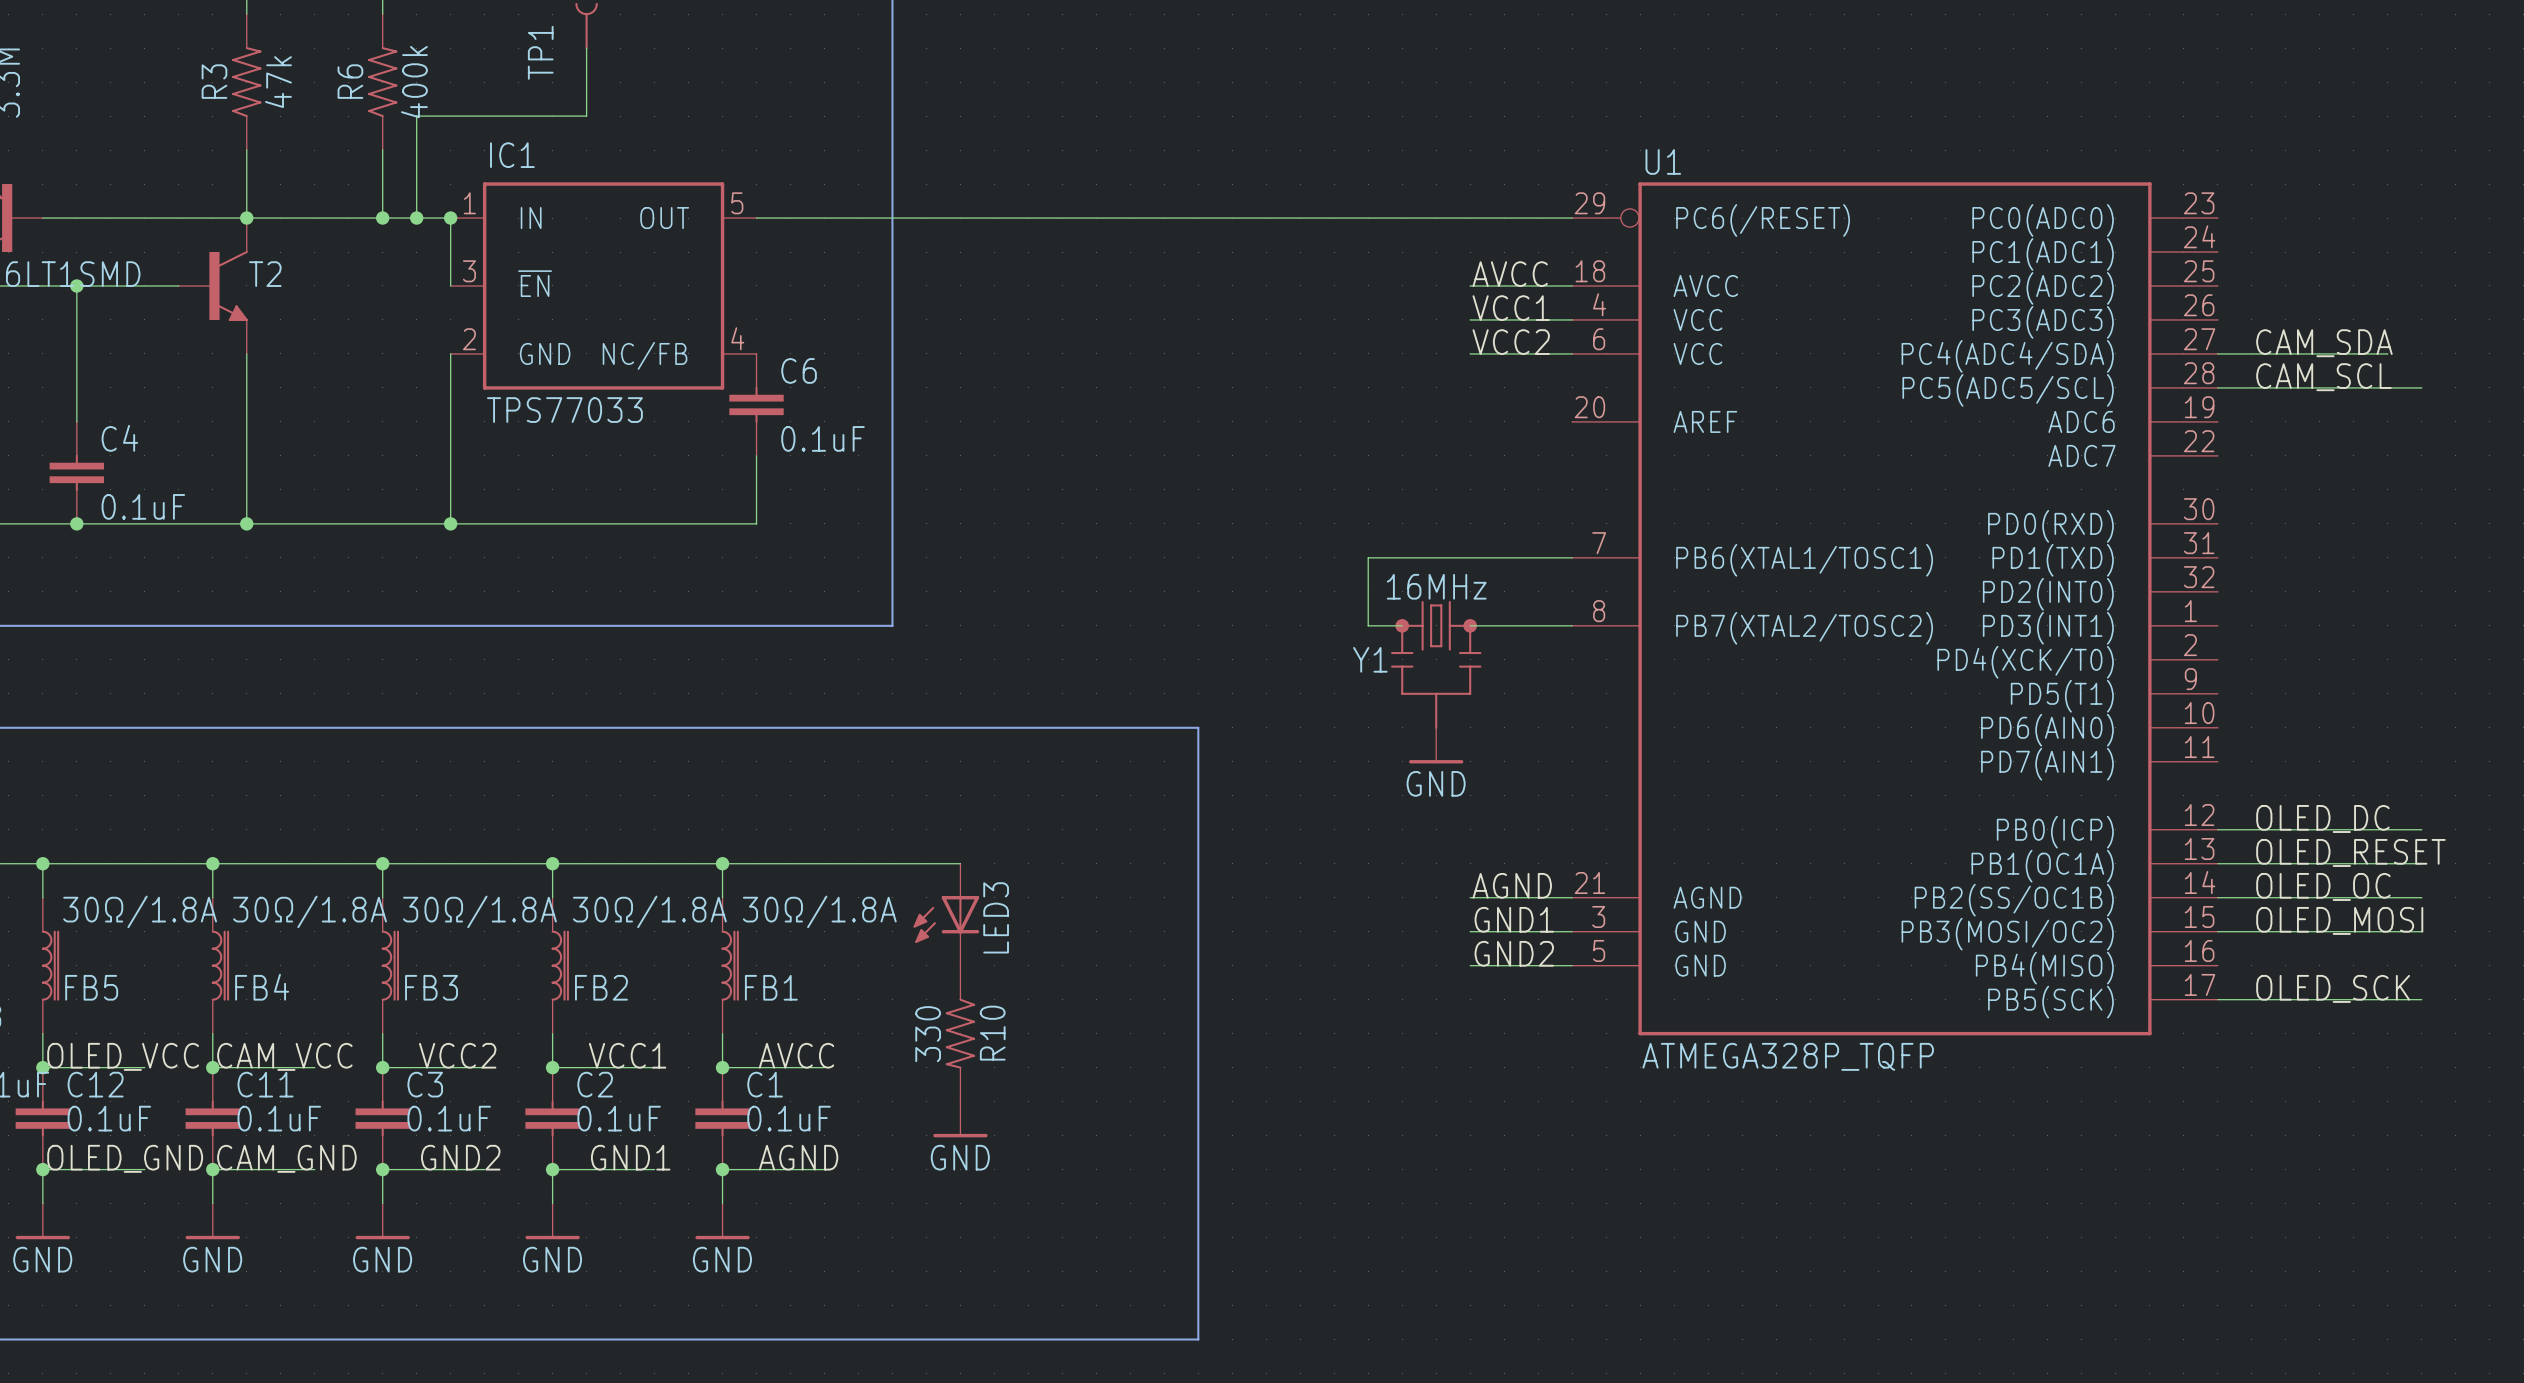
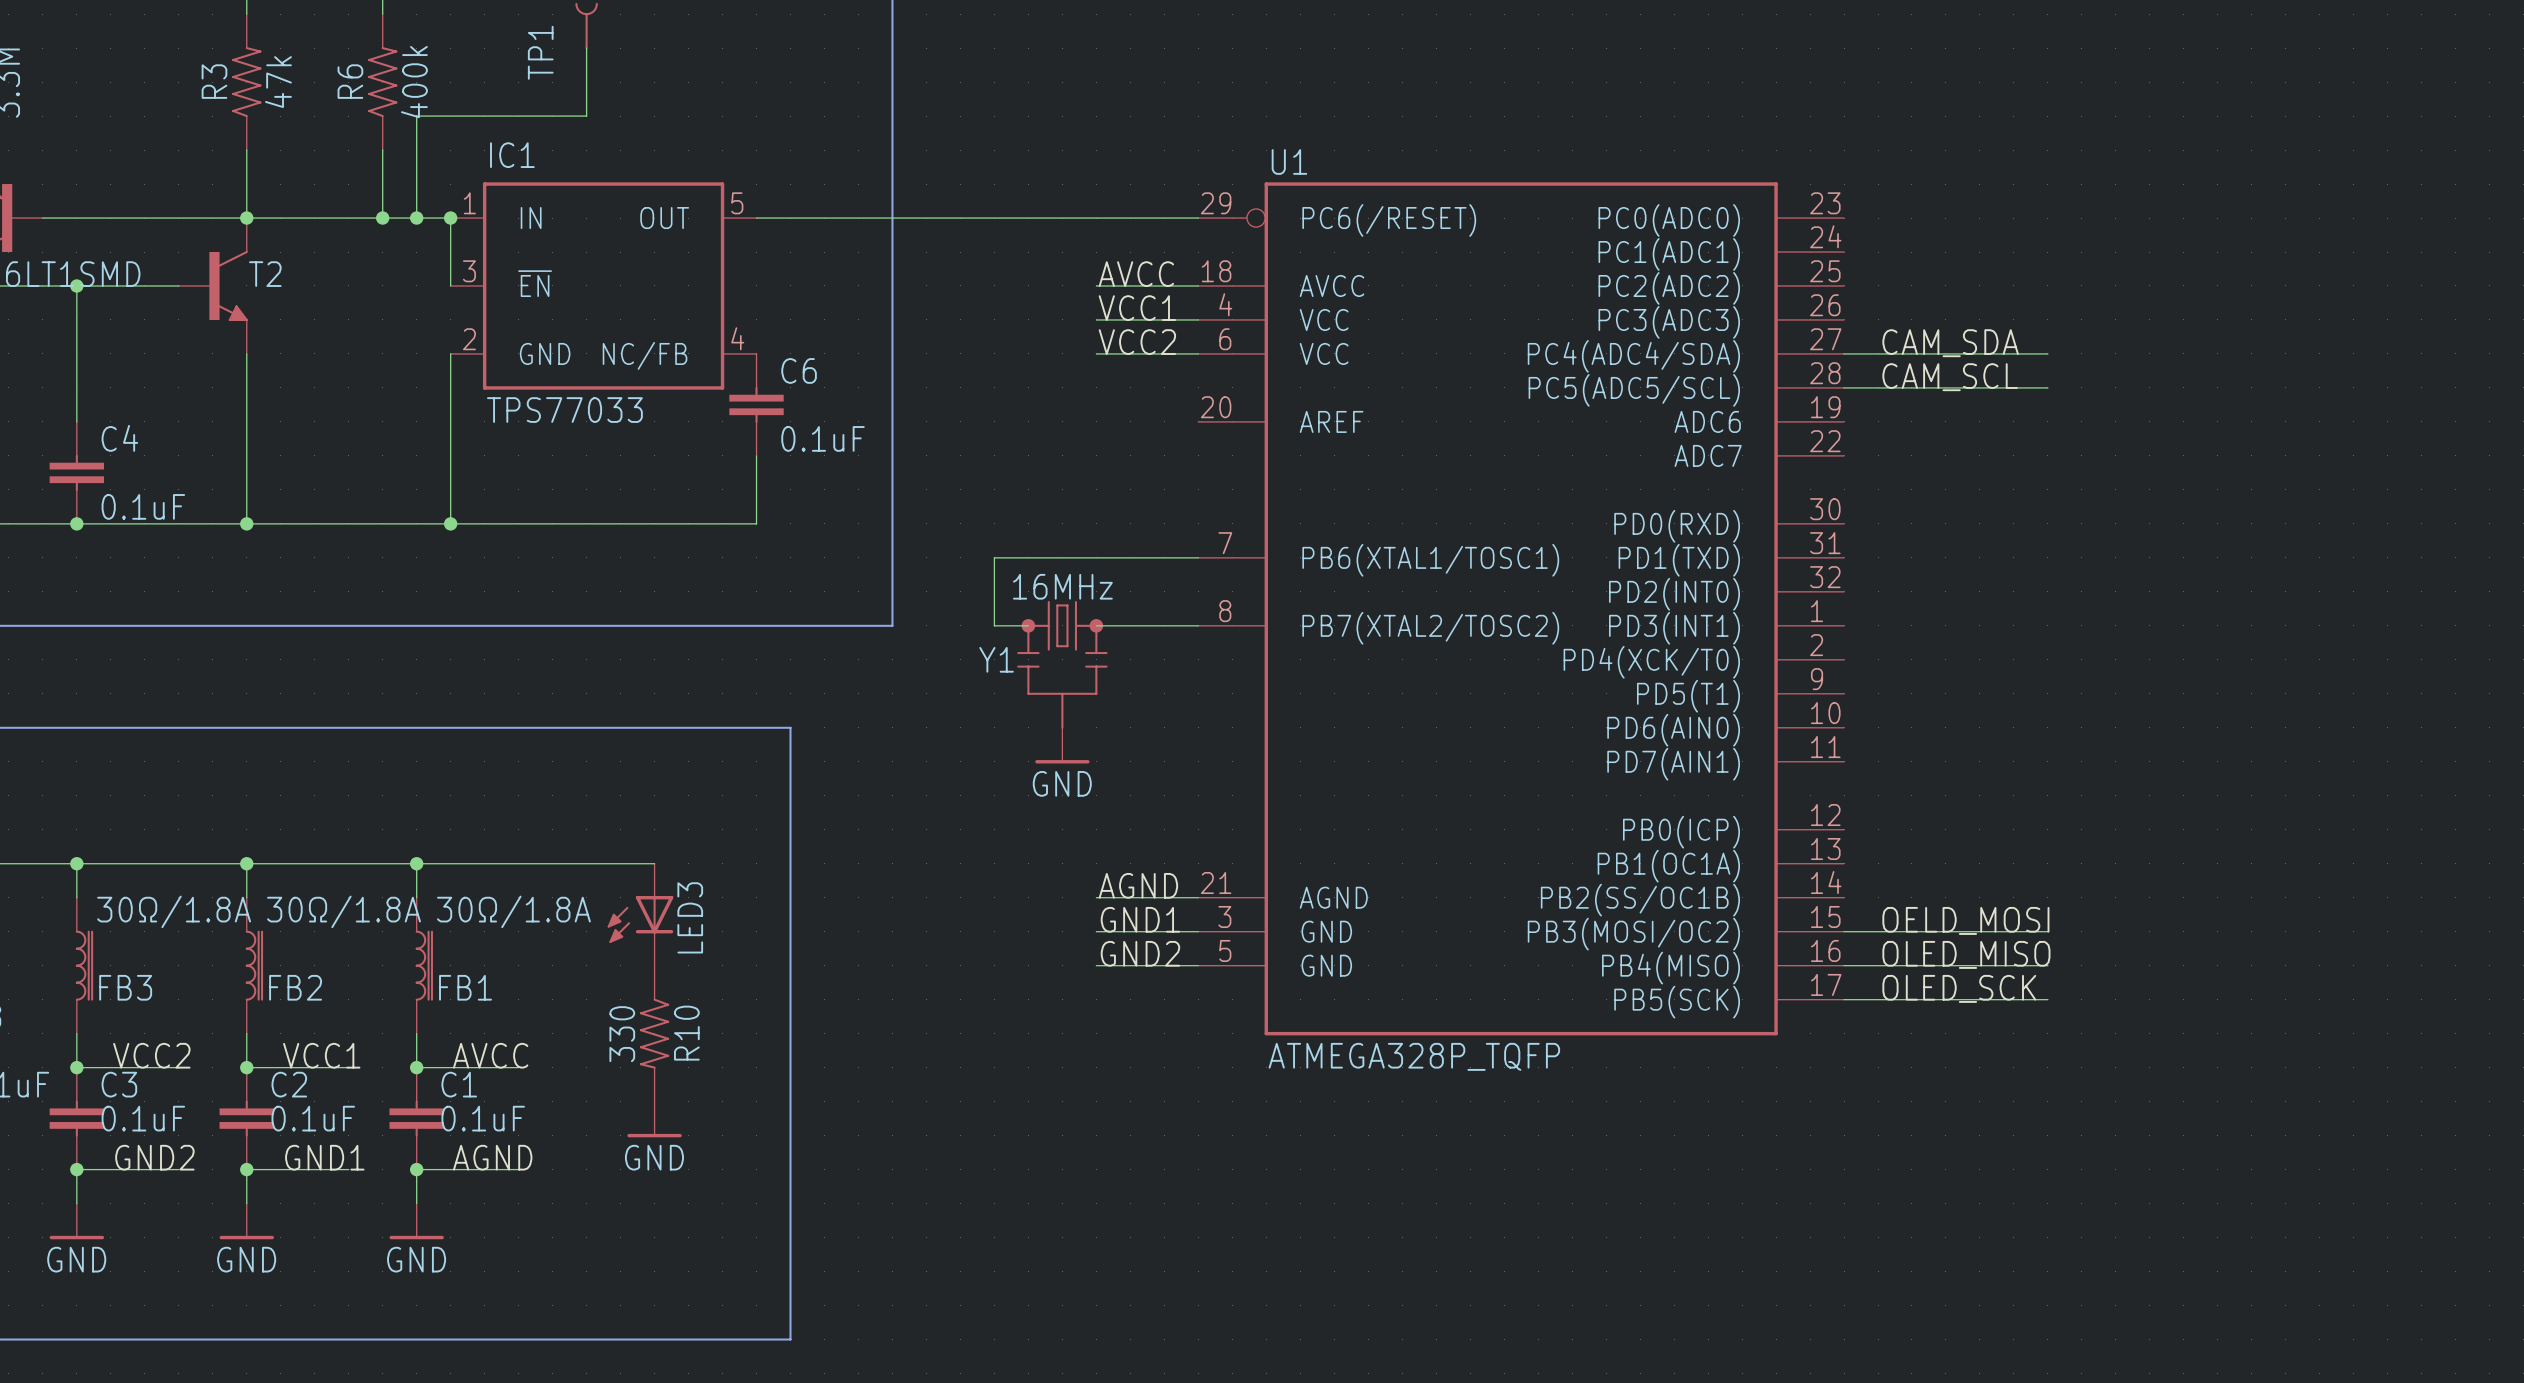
wire: (1198, 218) (1572, 218) -> none
label: none -> AVCC (1136, 274)
label: AVCC (1510, 274) -> none
wire: none -> (1096, 285) (1198, 285)
wire: (1470, 285) (1572, 285) -> none
label: none -> VCC1 (1137, 308)
label: VCC1 (1511, 308) -> none
wire: none -> (1096, 319) (1198, 319)
wire: (1470, 319) (1572, 319) -> none
label: none -> VCC2 (1137, 342)
label: VCC2 (1511, 342) -> none
label: none -> CAM_SDA (1950, 343)
label: CAM_SDA (2324, 343) -> none
wire: none -> (1096, 353) (1198, 353)
wire: (1470, 353) (1572, 353) -> none
wire: none -> (1844, 353) (2047, 353)
wire: (2217, 353) (2387, 353) -> none
label: none -> CAM_SCL (1950, 377)
label: CAM_SCL (2323, 377) -> none
wire: none -> (1844, 387) (2047, 387)
wire: (2217, 387) (2421, 387) -> none
wire: none -> (1198, 557) (994, 557) (994, 625) (1028, 625)
wire: (1572, 557) (1368, 557) (1368, 625) (1402, 625) -> none
U1 position: (1894, 608) -> (1521, 608)
wire: none -> (1096, 625) (1198, 625)
wire: (1470, 625) (1572, 625) -> none
Y1 position: (1436, 664) -> (1062, 664)
line: (790, 727) (1198, 727) (1198, 1339) (790, 1339) -> (790, 727) (790, 1339)
power symbol: none -> GND (1062, 745)
power symbol: GND (1436, 745) -> none
label: OLED_DC (2322, 818) -> none
wire: (2217, 829) (2421, 829) -> none
label: OLED_RESET (2350, 852) -> none
wire: (42, 863) (42, 897) -> (76, 863) (76, 897)
junction position: (42, 863) -> (76, 863)
wire: (212, 863) (212, 897) -> (246, 863) (246, 897)
junction position: (212, 863) -> (246, 863)
wire: (382, 863) (382, 897) -> (416, 863) (416, 897)
junction position: (382, 863) -> (416, 863)
wire: (552, 863) (552, 897) -> none
junction: (552, 863) -> none
wire: (654, 863) (960, 863) -> none
wire: (722, 863) (722, 897) -> none
junction: (722, 863) -> none
wire: (2217, 863) (2421, 863) -> none
label: none -> AGND (1138, 885)
label: AGND (1512, 885) -> none
label: OLED_OC (2323, 886) -> none
wire: none -> (1096, 897) (1198, 897)
wire: (1470, 897) (1572, 897) -> none
wire: (2217, 897) (2421, 897) -> none
LED3 position: (946, 914) -> (640, 914)
label: none -> GND1 (1140, 919)
label: GND1 (1514, 919) -> none
label: none -> OELD_MOSI (1965, 920)
label: OLED_MOSI (2339, 920) -> none
wire: none -> (1096, 931) (1198, 931)
wire: (1470, 931) (1572, 931) -> none
wire: none -> (1844, 931) (2047, 931)
wire: (2217, 931) (2421, 931) -> none
label: none -> GND2 (1140, 953)
label: GND2 (1514, 953) -> none
label: none -> OLED_MISO (1966, 954)
FB5: 30Ω/1.8A (50, 965) -> none
FB4: 30Ω/1.8A (220, 965) -> none
FB3 position: (390, 965) -> (84, 965)
FB2 position: (560, 965) -> (254, 965)
FB1 position: (730, 965) -> (424, 965)
wire: none -> (1096, 965) (1198, 965)
wire: (1470, 965) (1572, 965) -> none
wire: none -> (1844, 965) (2047, 965)
label: none -> OLED_SCK (1959, 988)
label: OLED_SCK (2333, 988) -> none
wire: none -> (1844, 999) (2047, 999)
wire: (2217, 999) (2421, 999) -> none
wire: (42, 1033) (42, 1067) (76, 1067) -> (76, 1033) (76, 1067)
wire: (212, 1033) (212, 1067) (246, 1067) -> (246, 1033) (246, 1067)
wire: (382, 1033) (382, 1067) (416, 1067) -> (416, 1033) (416, 1067)
wire: (552, 1033) (552, 1067) (654, 1067) -> none
wire: (722, 1033) (722, 1067) (824, 1067) -> none
R10 position: (960, 1033) -> (654, 1033)
label position: VCC2 (457, 1055) -> VCC2 (151, 1055)
label position: VCC1 (627, 1055) -> VCC1 (321, 1055)
label position: AVCC (796, 1055) -> AVCC (490, 1055)
label: OLED_VCC (123, 1056) -> none
label: CAM_VCC (284, 1056) -> none
junction position: (42, 1067) -> (76, 1067)
wire: none -> (144, 1067) (178, 1067)
junction position: (212, 1067) -> (246, 1067)
wire: none -> (314, 1067) (348, 1067)
junction position: (382, 1067) -> (416, 1067)
wire: none -> (484, 1067) (518, 1067)
junction: (552, 1067) -> none
junction: (722, 1067) -> none
C12: 0.1uF (42, 1118) -> none
C11: 0.1uF (212, 1118) -> none
C3 position: (382, 1118) -> (76, 1118)
C2 position: (552, 1118) -> (246, 1118)
C1 position: (722, 1118) -> (416, 1118)
power symbol: none -> GND (654, 1119)
power symbol: GND (960, 1119) -> none
label: none -> GND1 (324, 1157)
label position: GND2 (460, 1157) -> GND2 (154, 1157)
label: none -> AGND (492, 1157)
label: GND1 (630, 1157) -> none
label: AGND (798, 1157) -> none
label: OLED_GND (125, 1158) -> none
label: CAM_GND (286, 1158) -> none
junction position: (42, 1169) -> (76, 1169)
wire: (76, 1169) (42, 1169) (42, 1203) -> (76, 1169) (76, 1203)
wire: none -> (144, 1169) (178, 1169)
junction position: (212, 1169) -> (246, 1169)
wire: (246, 1169) (212, 1169) (212, 1203) -> (246, 1169) (246, 1203)
wire: none -> (314, 1169) (348, 1169)
junction position: (382, 1169) -> (416, 1169)
wire: (416, 1169) (382, 1169) (382, 1203) -> (416, 1169) (416, 1203)
wire: none -> (484, 1169) (518, 1169)
junction: (552, 1169) -> none
wire: (654, 1169) (552, 1169) (552, 1203) -> none
junction: (722, 1169) -> none
wire: (824, 1169) (722, 1169) (722, 1203) -> none
power symbol position: GND (42, 1221) -> GND (76, 1221)
power symbol position: GND (212, 1221) -> GND (246, 1221)
power symbol position: GND (382, 1221) -> GND (416, 1221)
power symbol: GND (552, 1221) -> none
power symbol: GND (722, 1221) -> none

